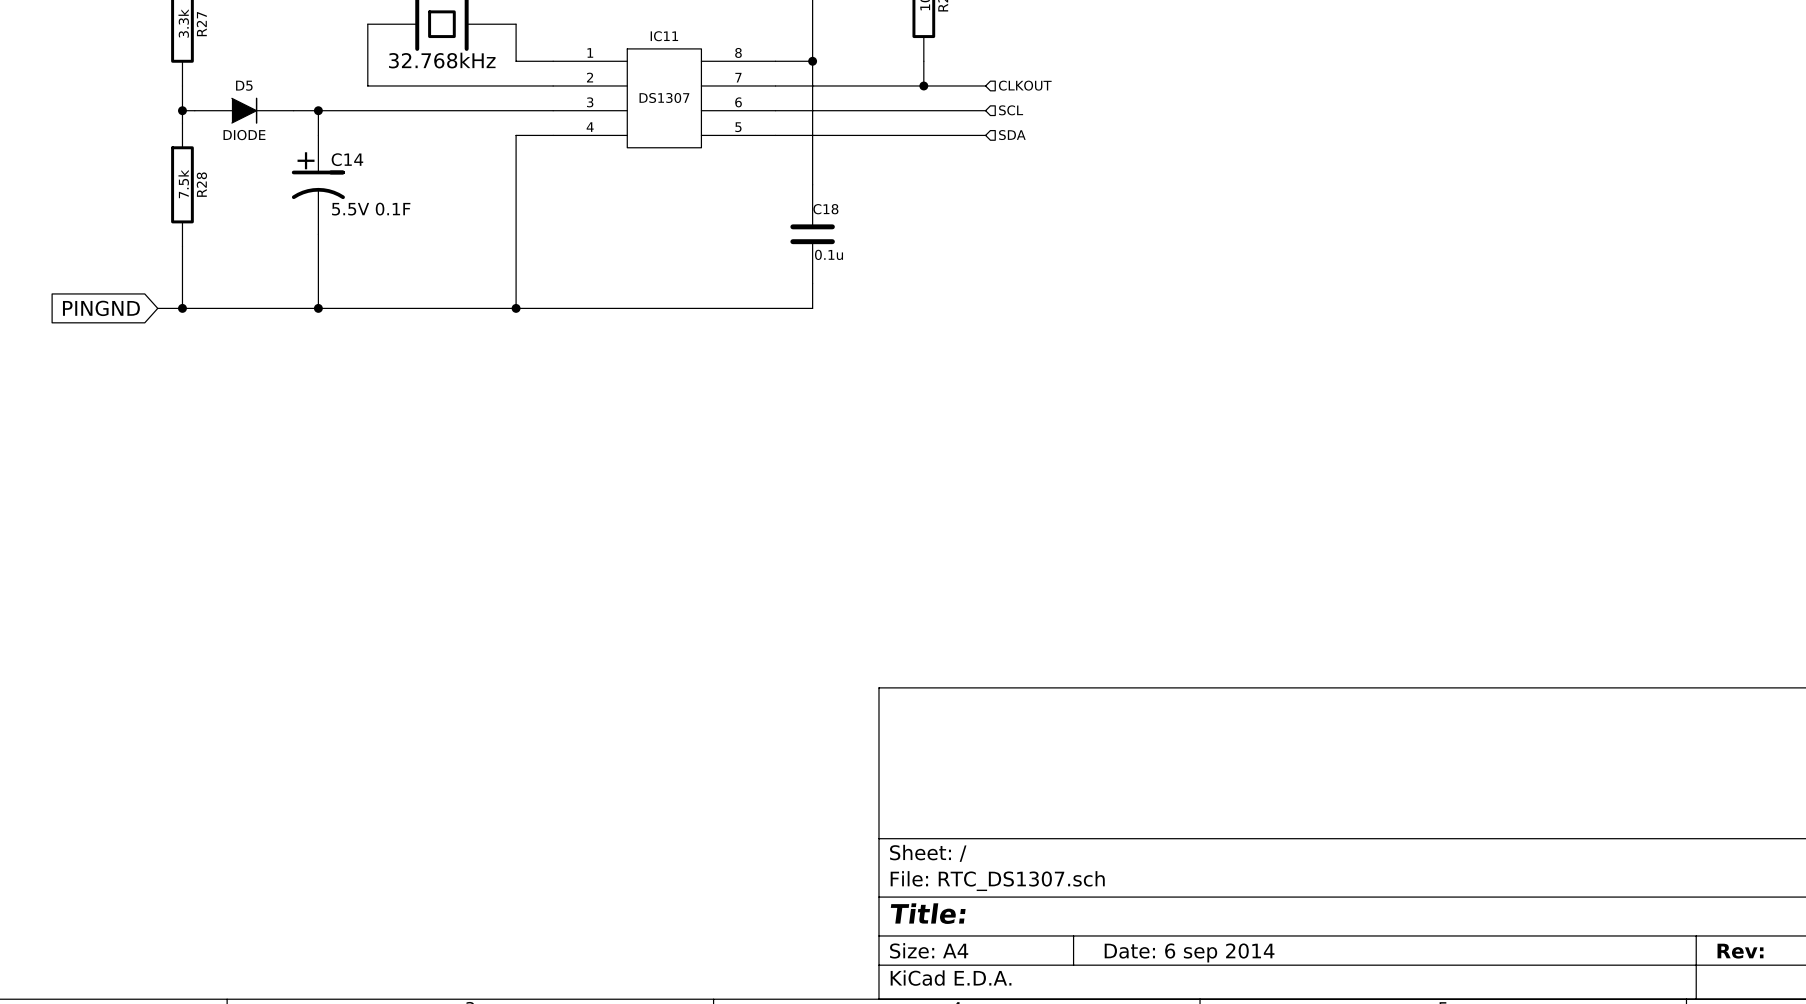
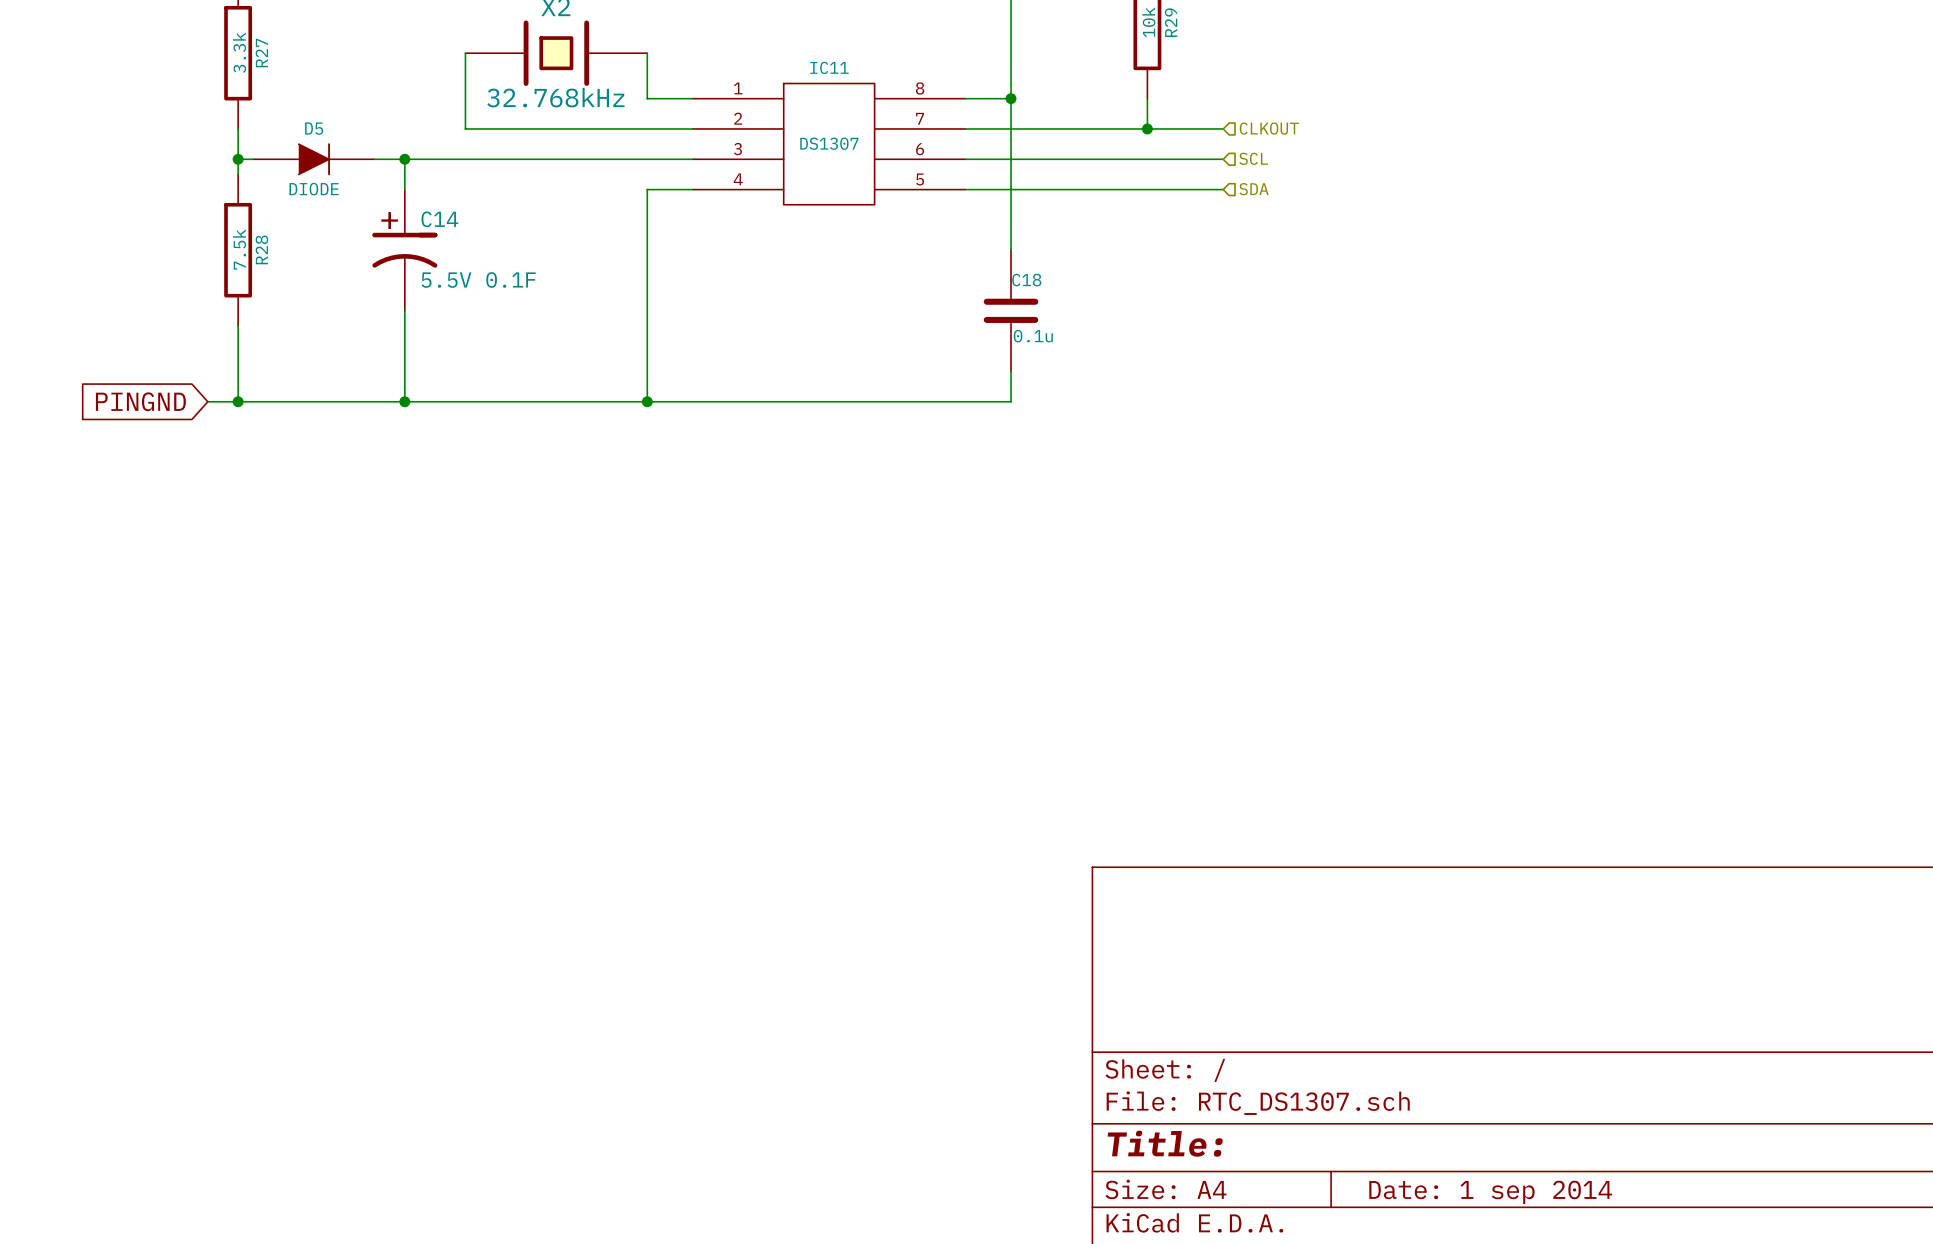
title block: Date: 6 sep 2014 (1189, 952) -> Date: 1 sep 2014 (1490, 1192)

